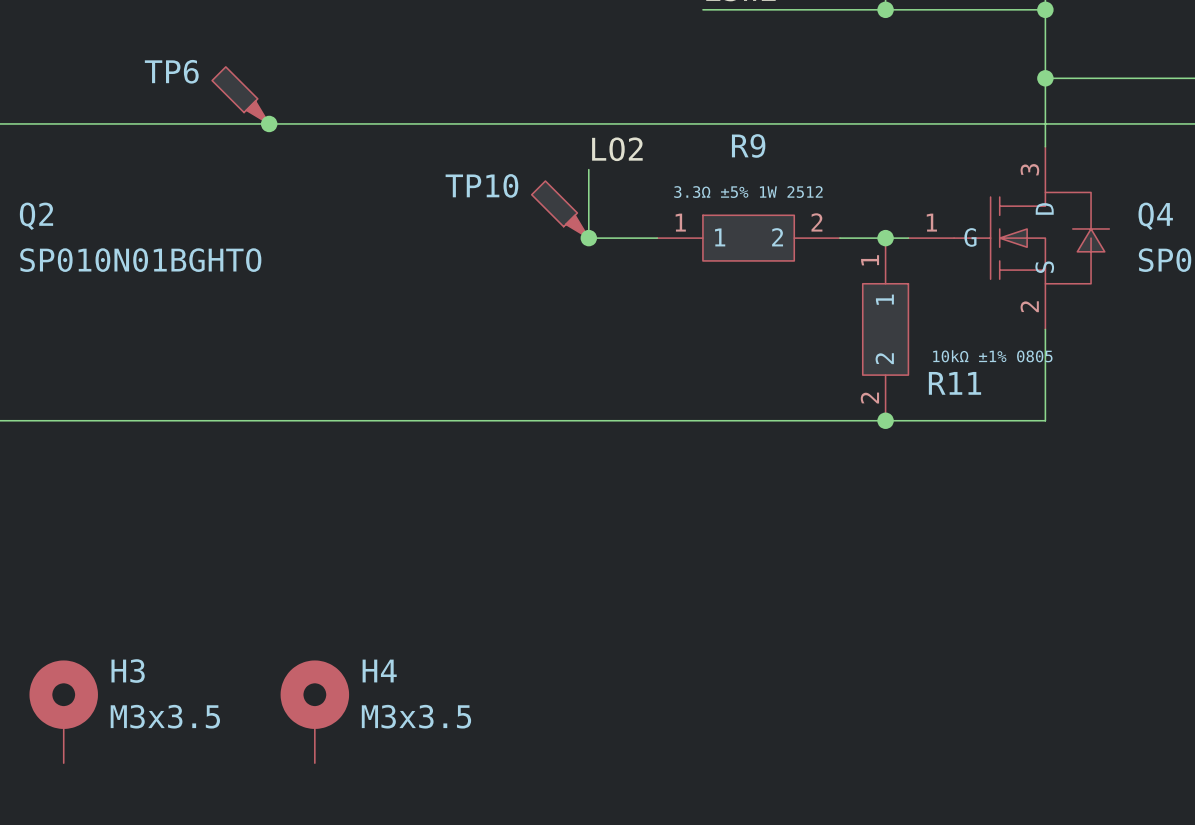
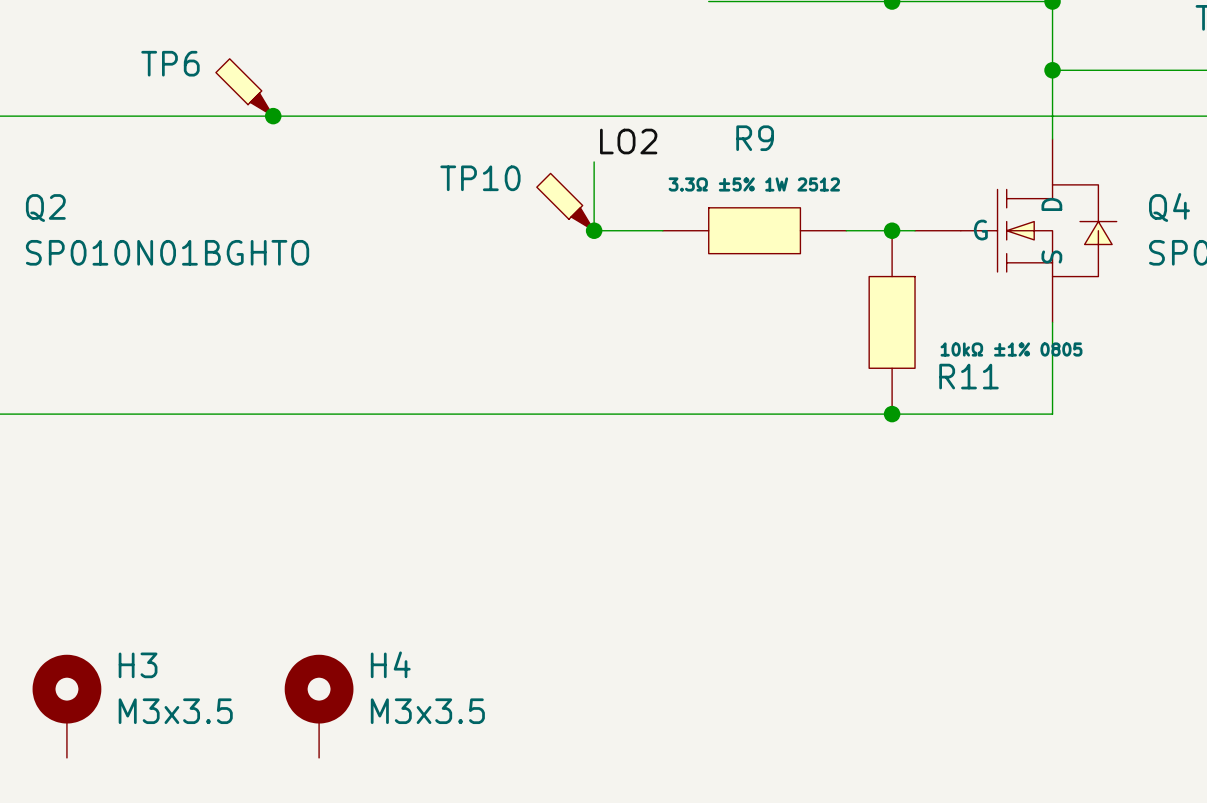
Q4 pin number: 3 (1029, 169) -> none
R9 pin number: 1 (680, 222) -> none
R9 pin number: 2 (816, 222) -> none
Q4 pin number: 1 (931, 222) -> none
R9 pin name: 1 (720, 237) -> none
R9 pin name: 2 (777, 237) -> none
R11 pin number: 1 (870, 260) -> none
R11 pin name: 1 (884, 299) -> none
Q4 pin number: 2 (1029, 306) -> none
R11 pin name: 2 (884, 358) -> none
R11 pin number: 2 (869, 398) -> none

